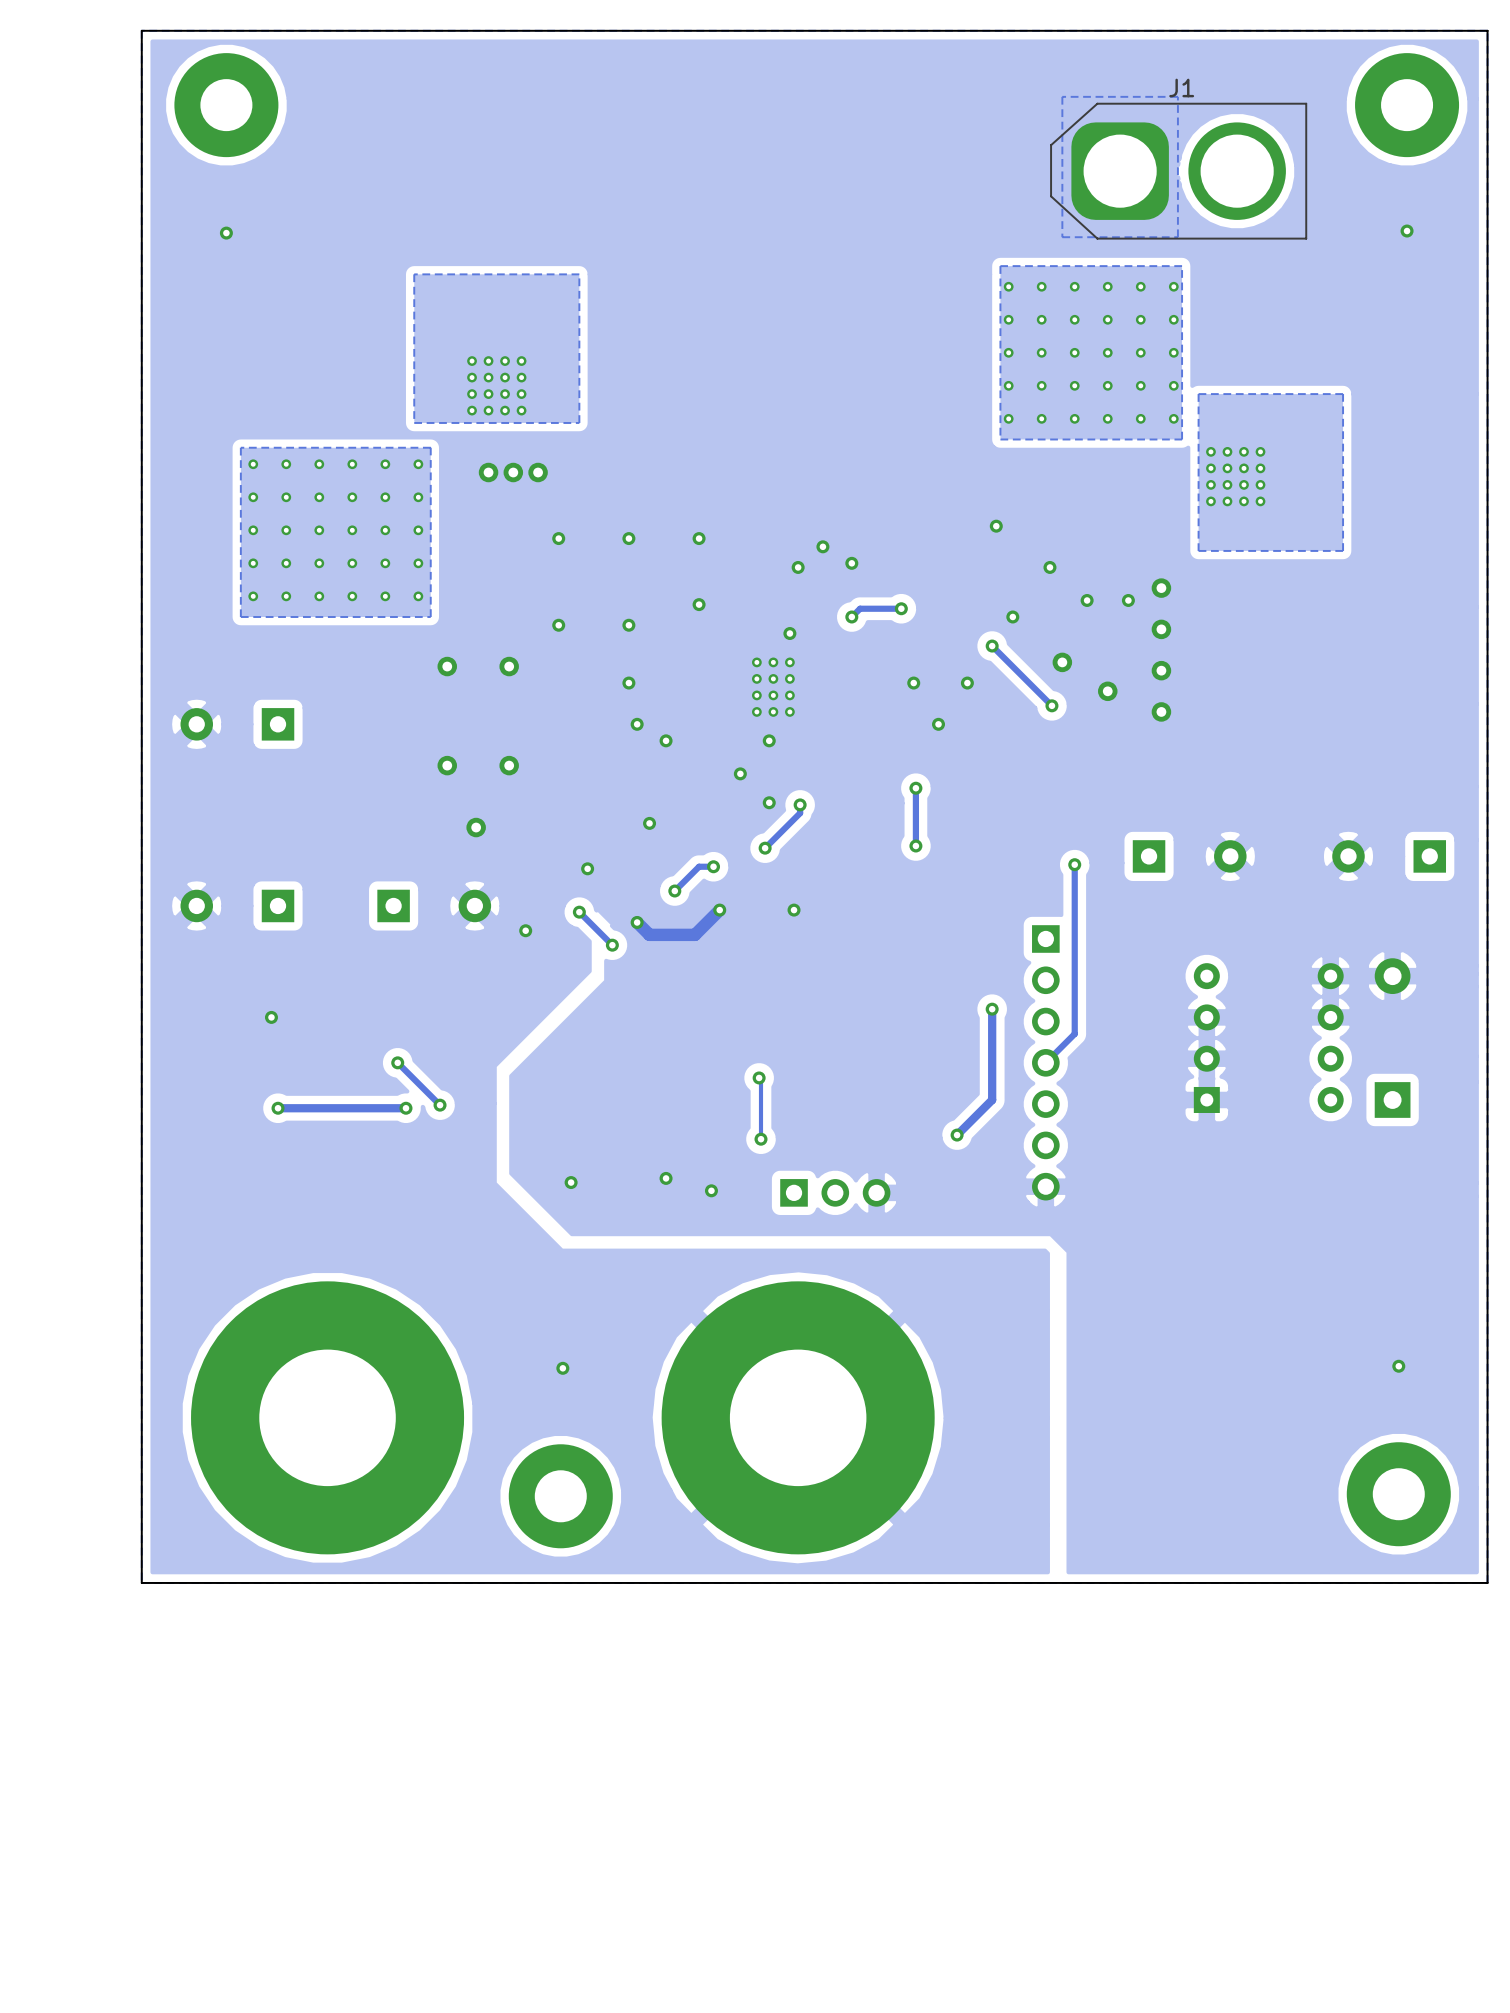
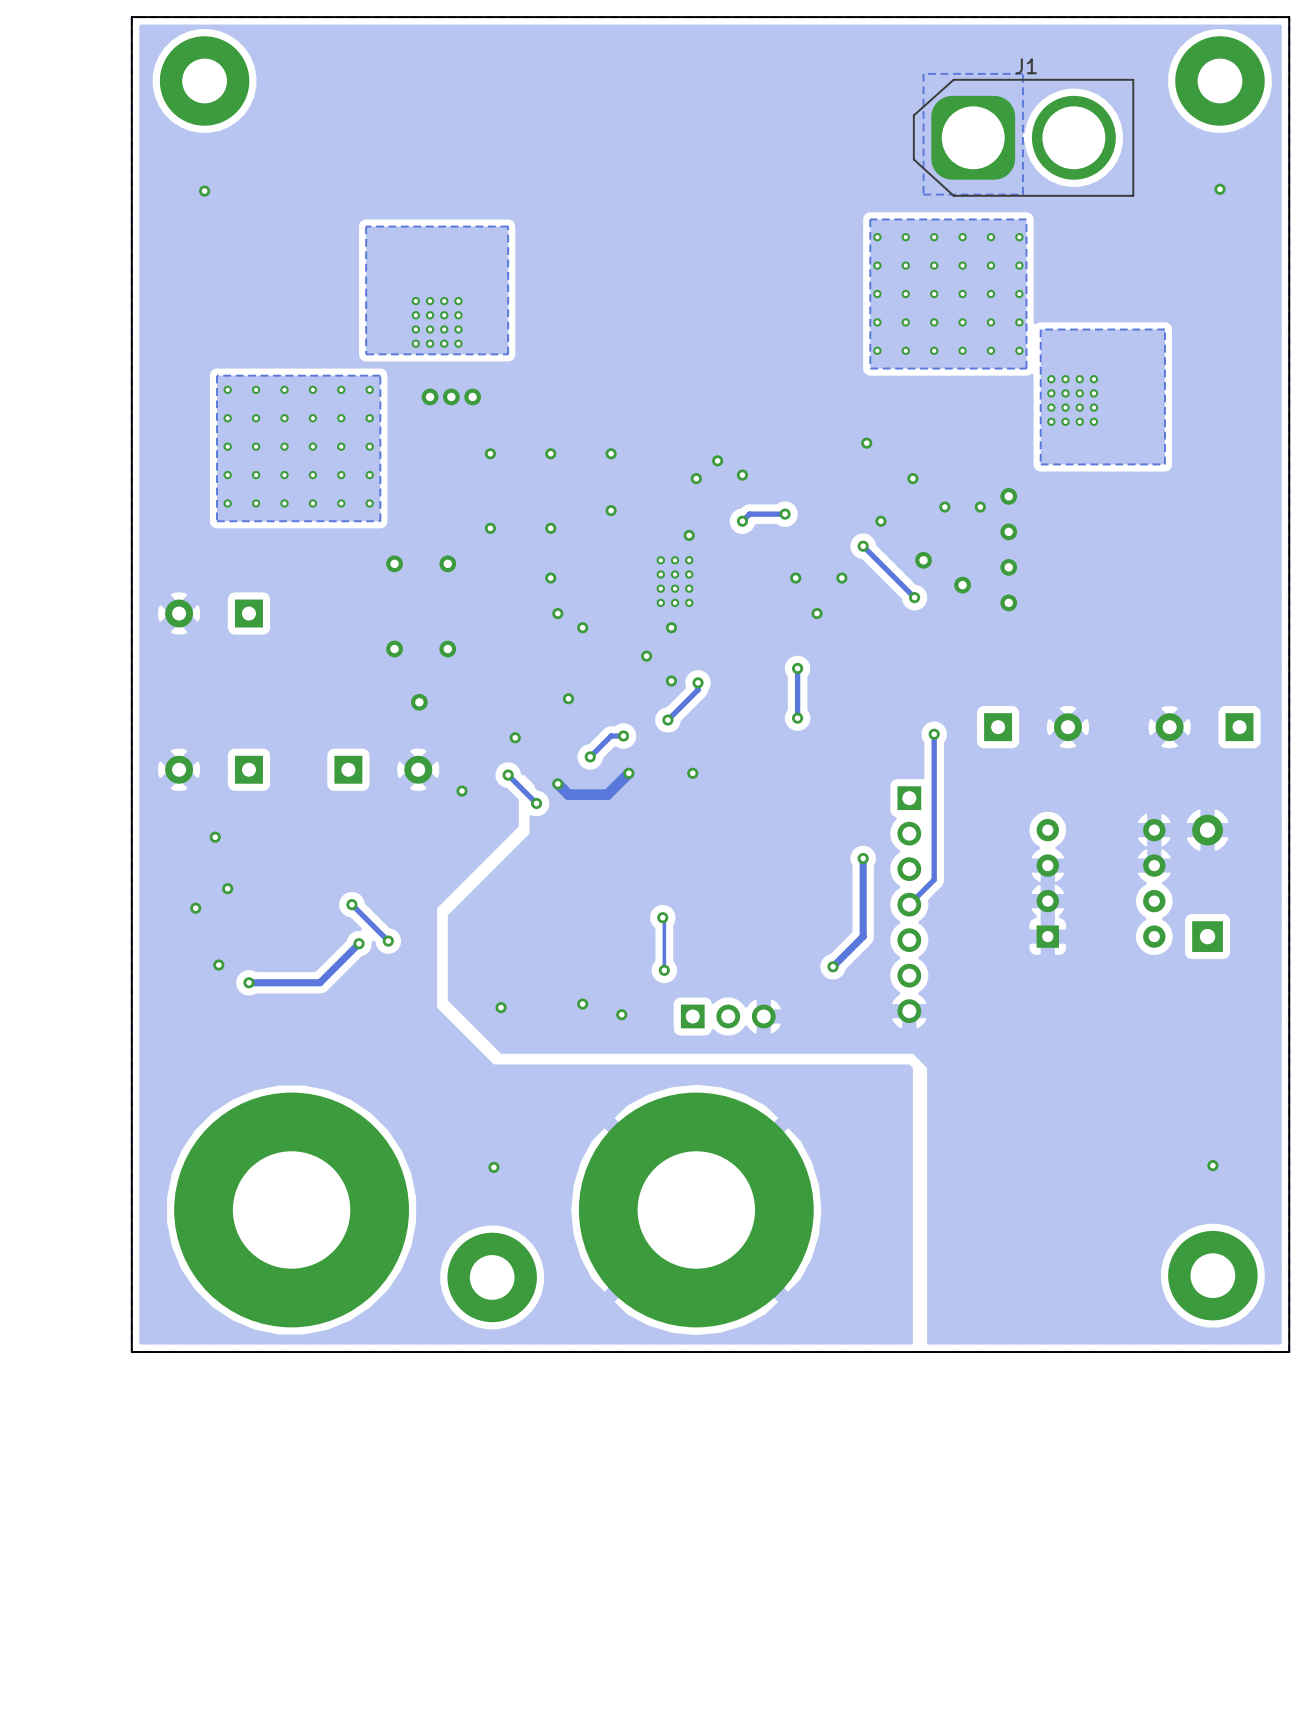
via: none -> (215, 837)
via: (271, 1017) -> none
via: none -> (227, 888)
via: none -> (195, 908)
via: (278, 1108) -> none
track: (405, 1108) (278, 1108) -> (359, 943) (319, 982) (248, 982)
via: none -> (218, 965)
via: none -> (248, 982)

